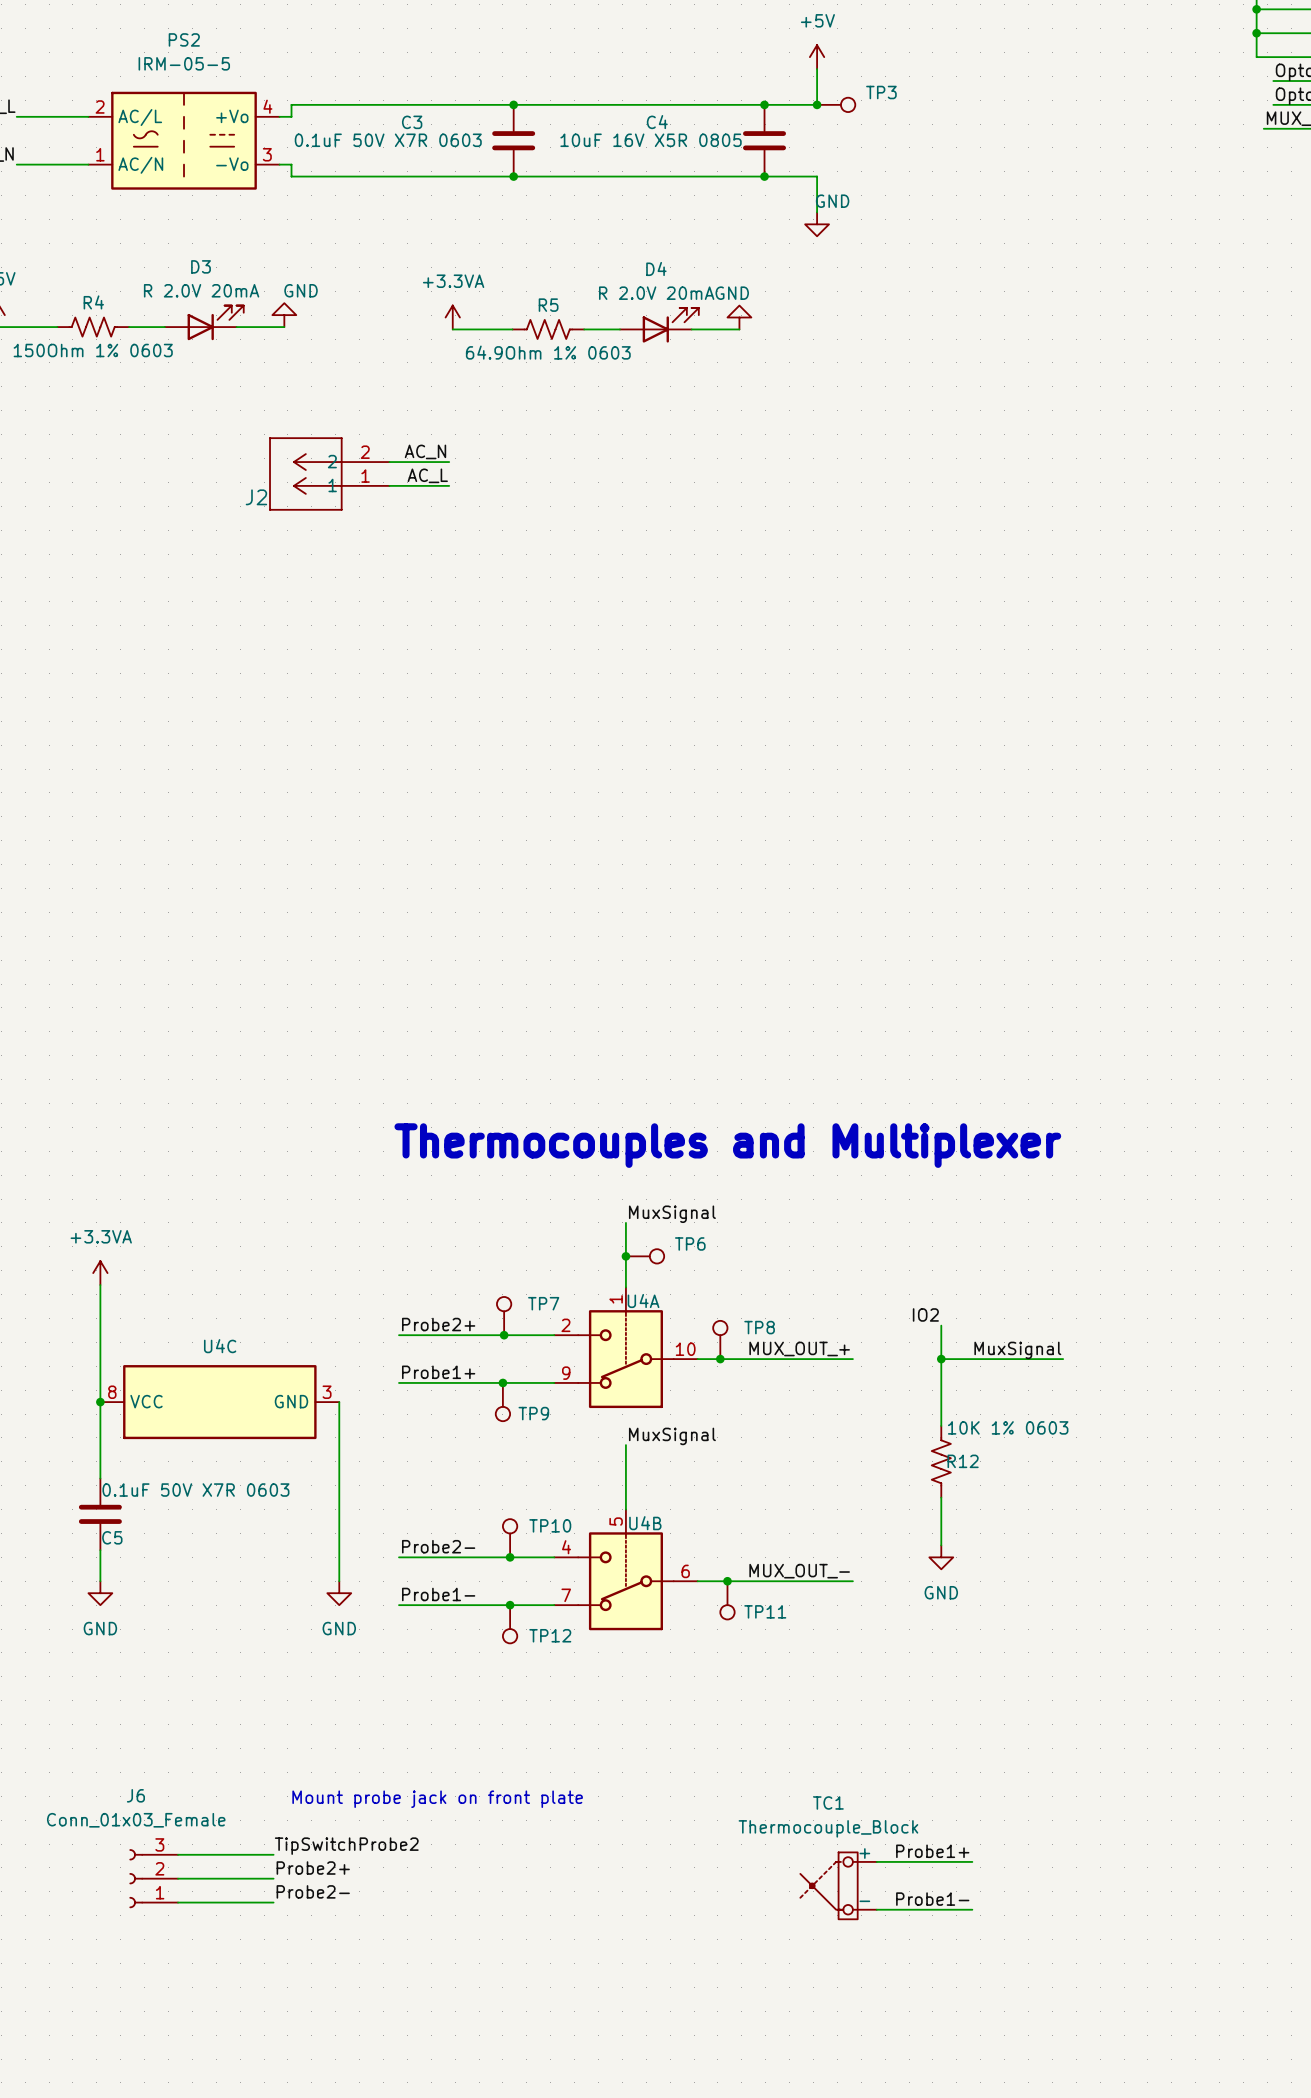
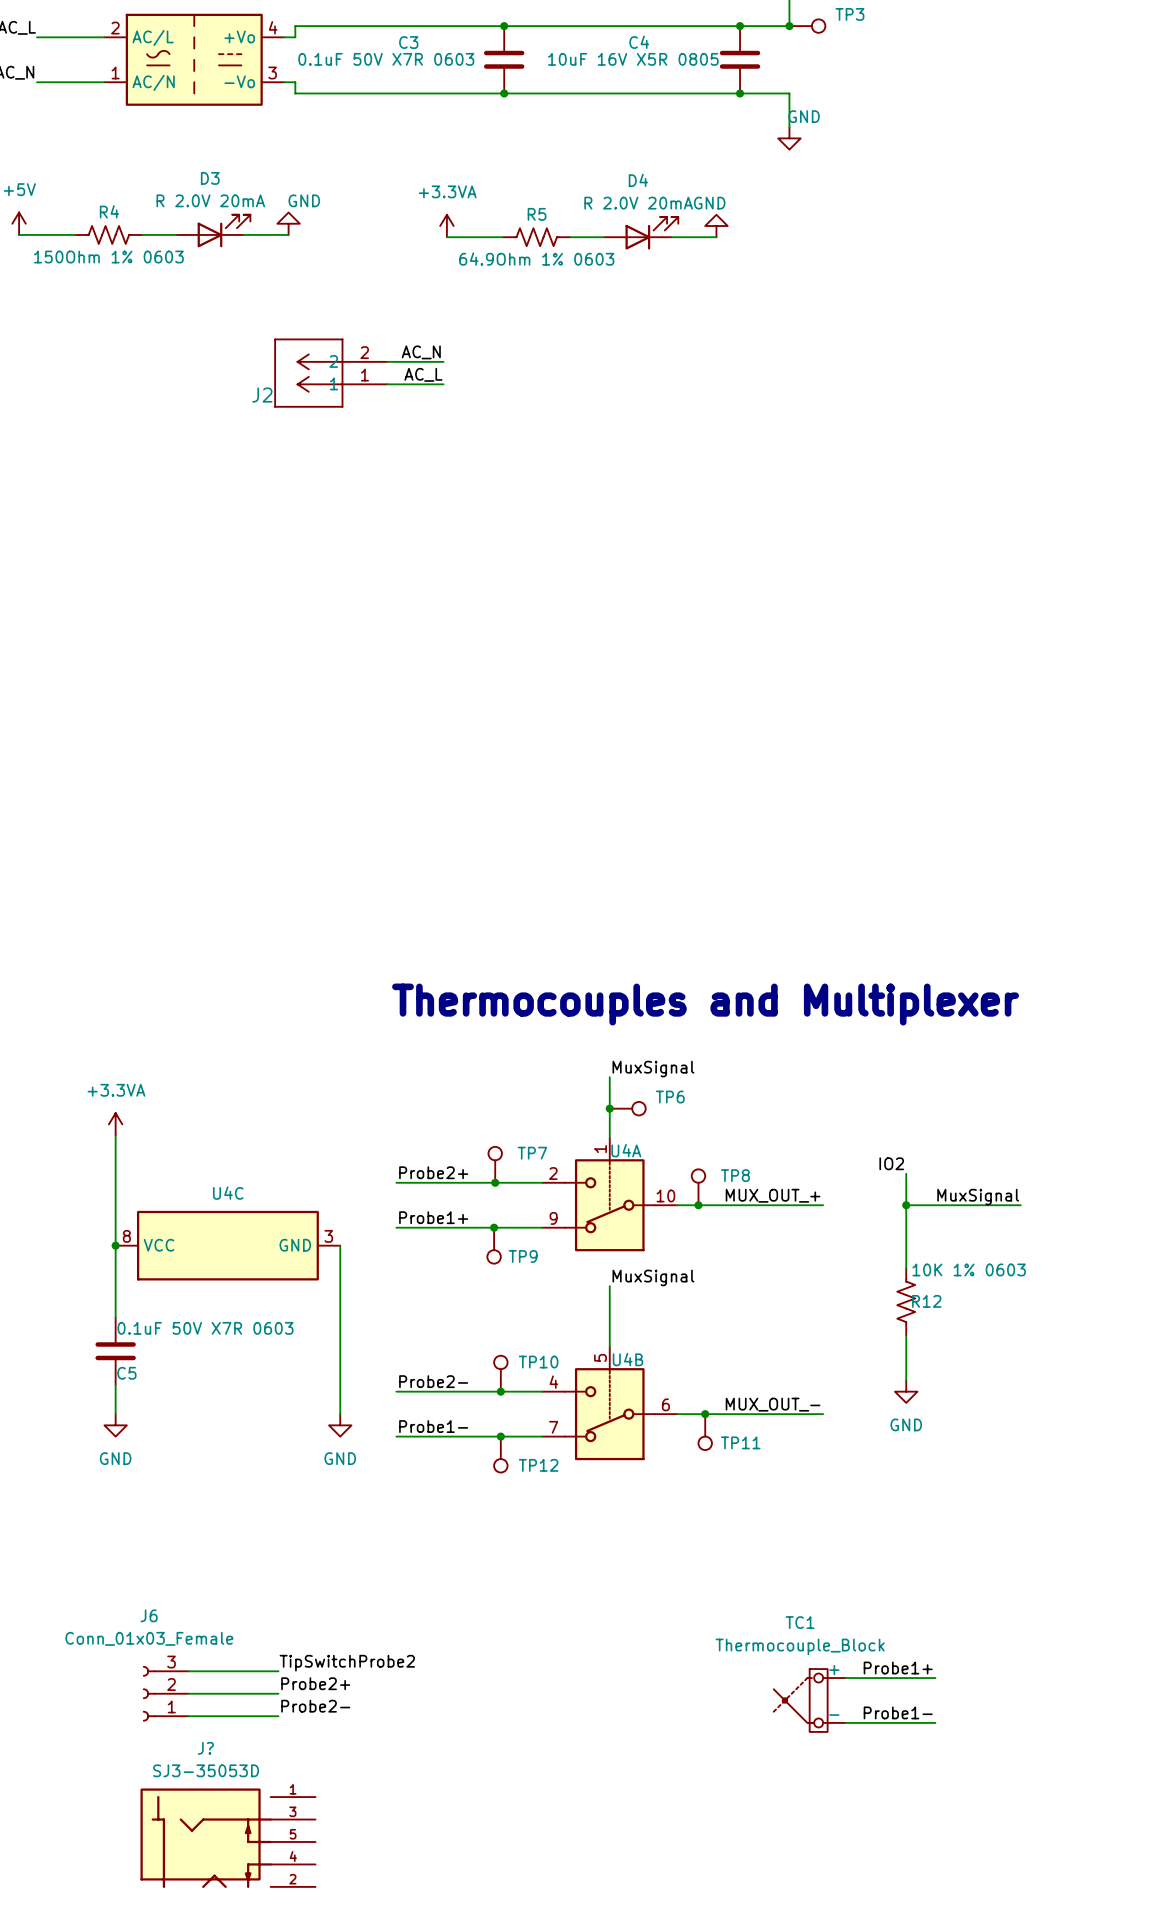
text: Mount probe jack on front plate (437, 1799) -> none
J?: none -> SJ3-35053D (228, 1838)

